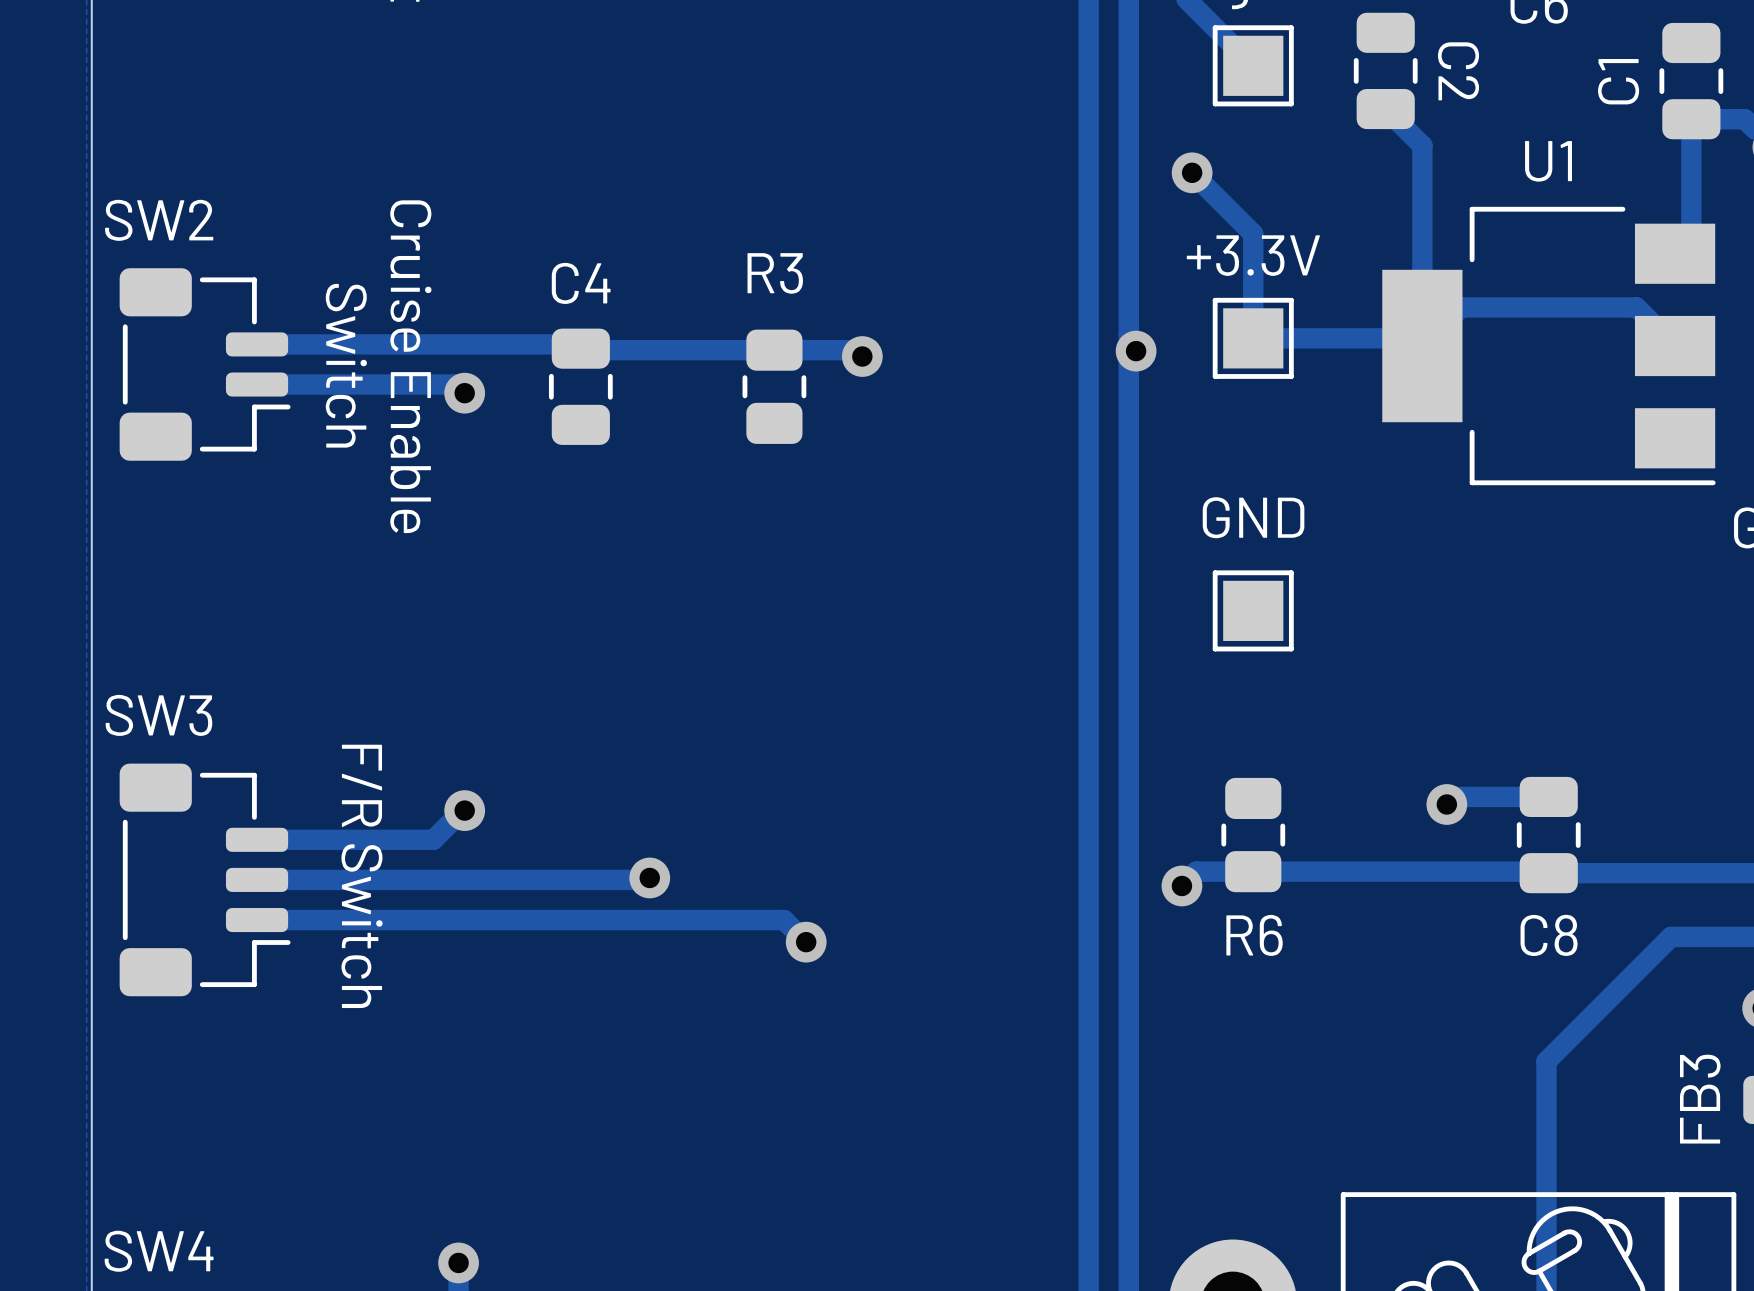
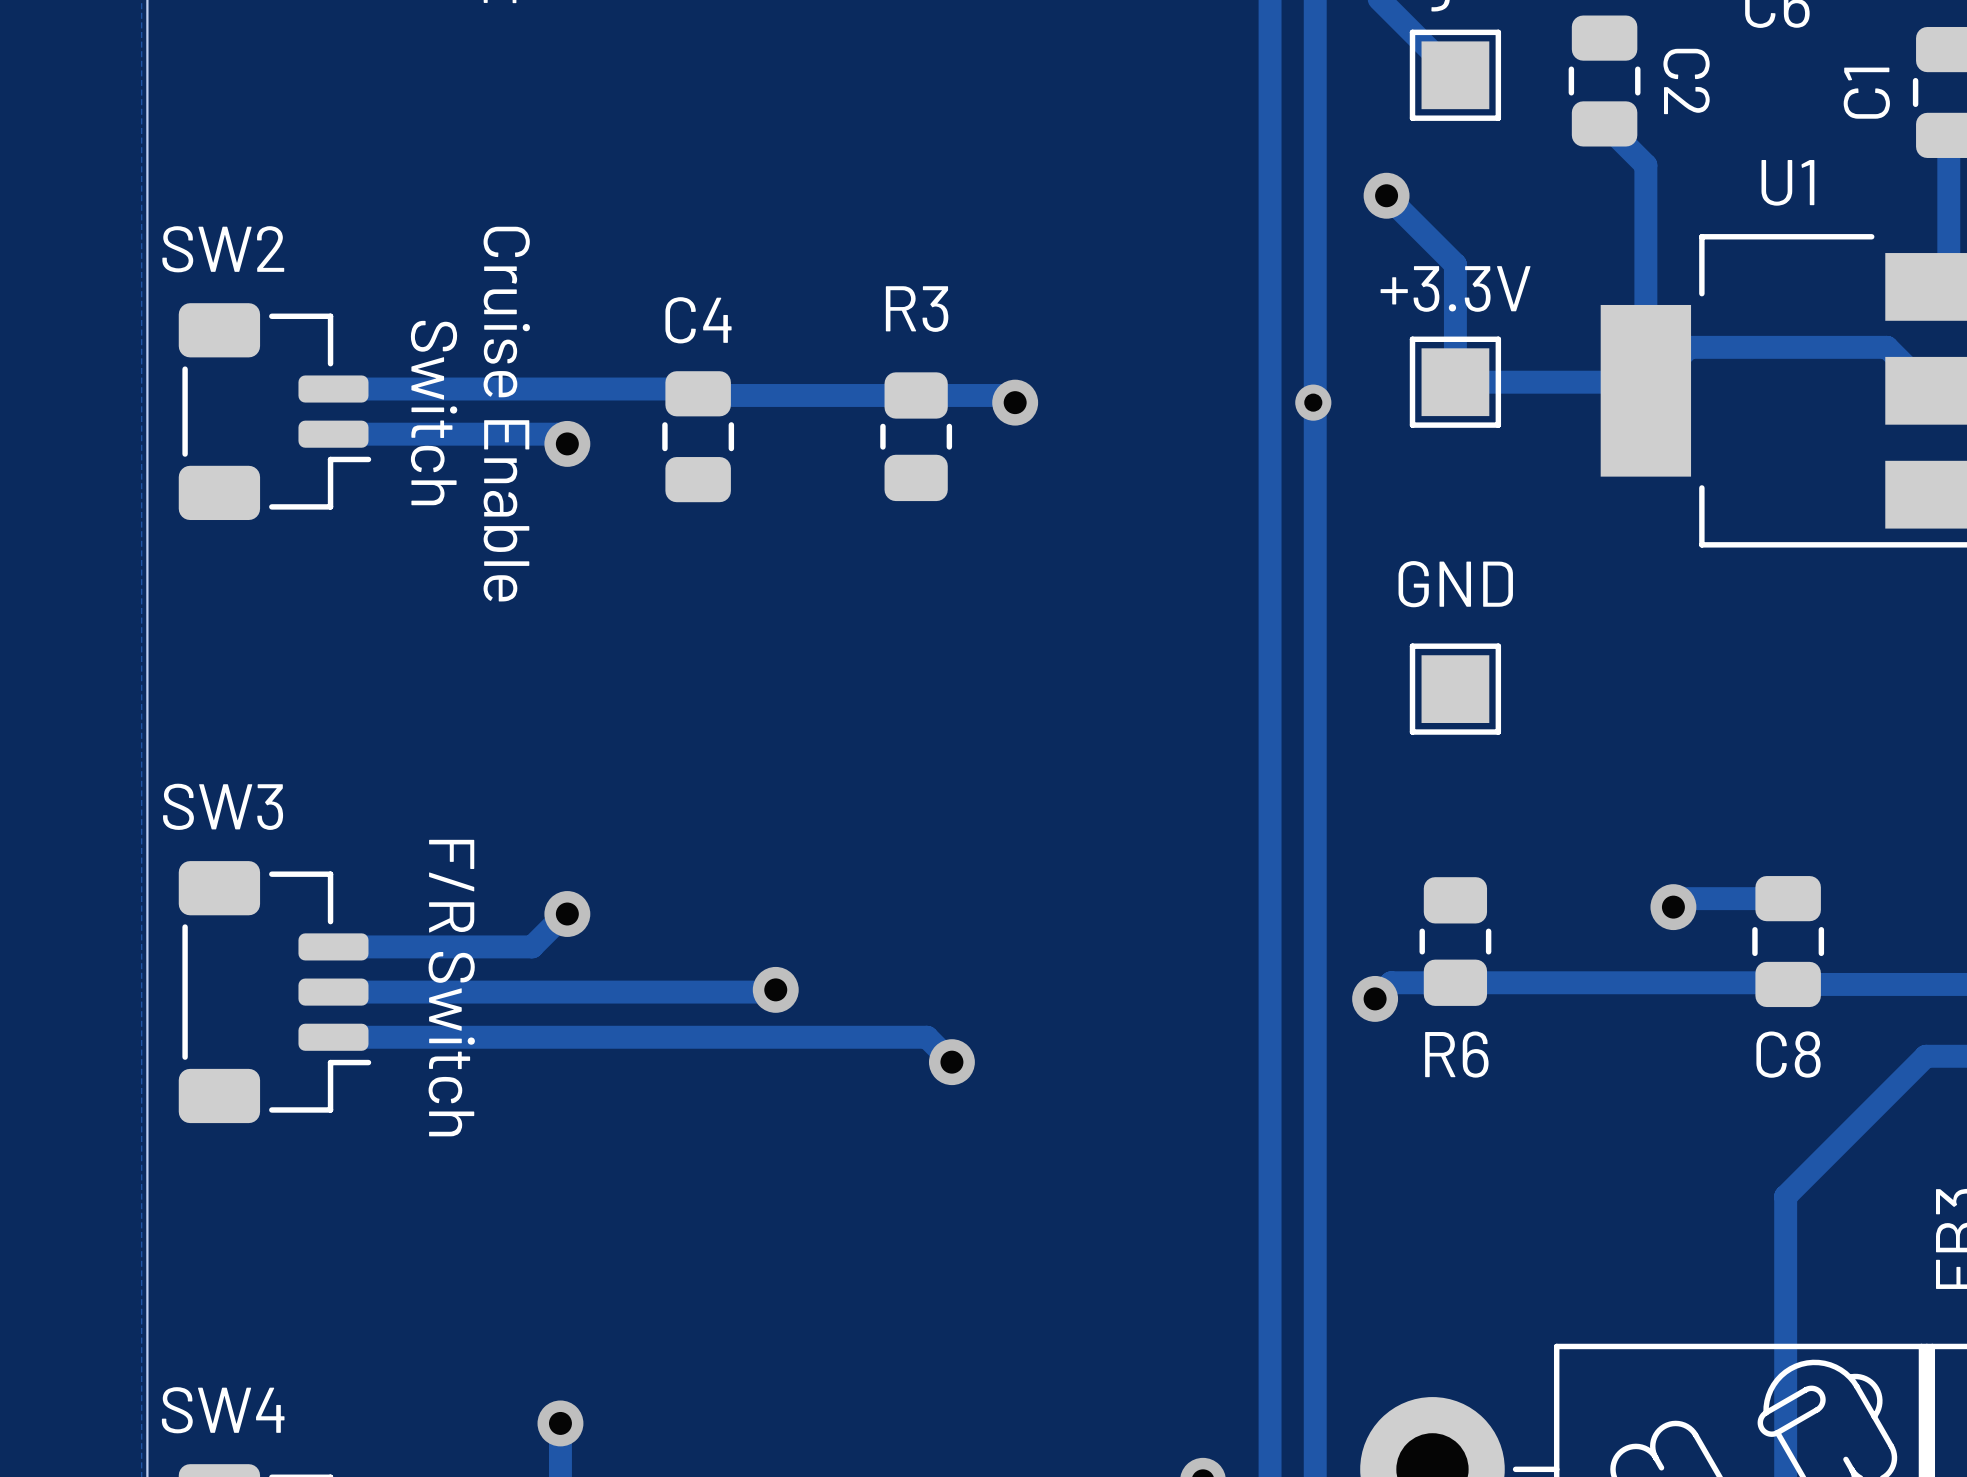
via size: [1115, 330, 1157, 372] -> [1295, 384, 1332, 421]

